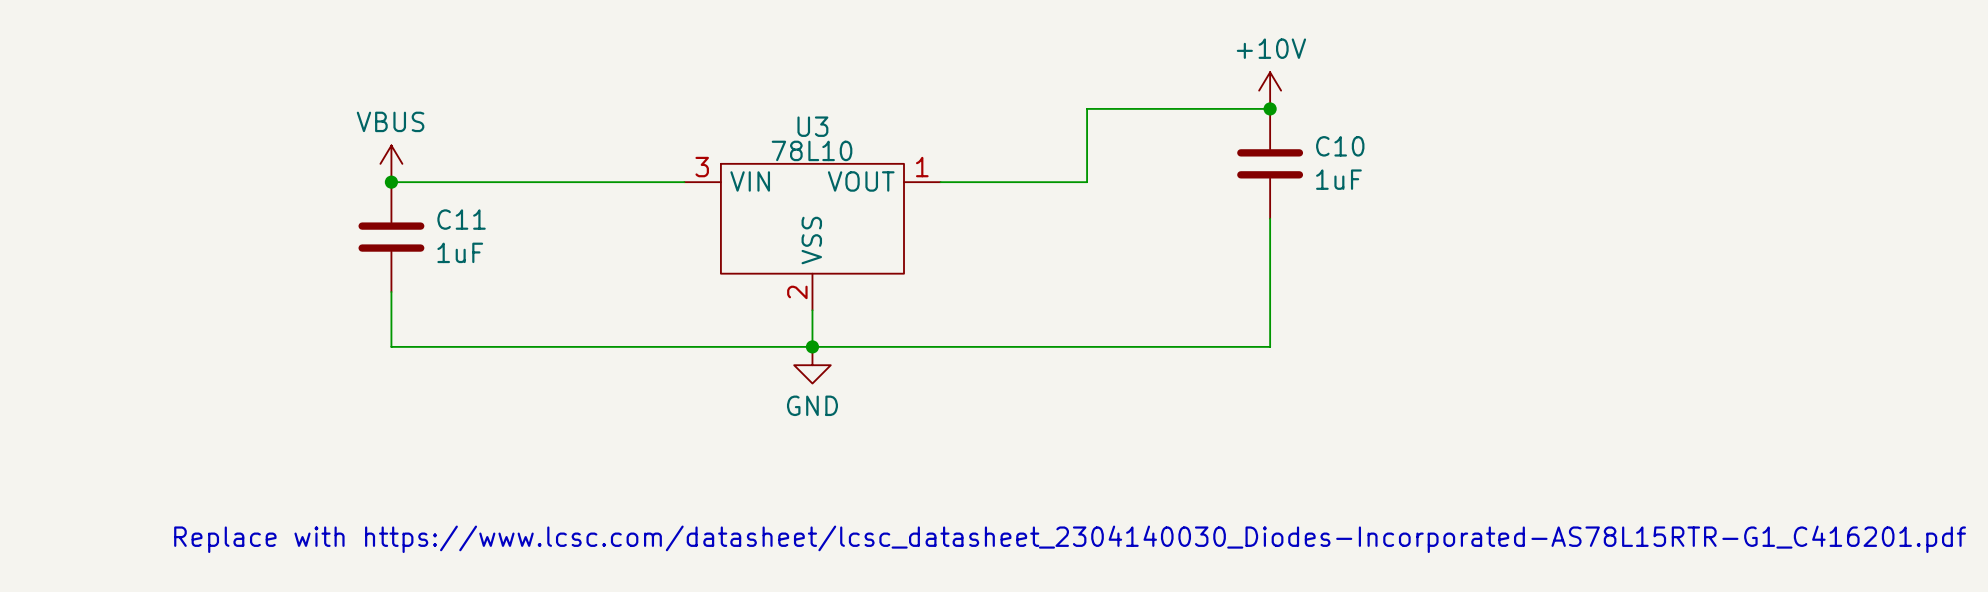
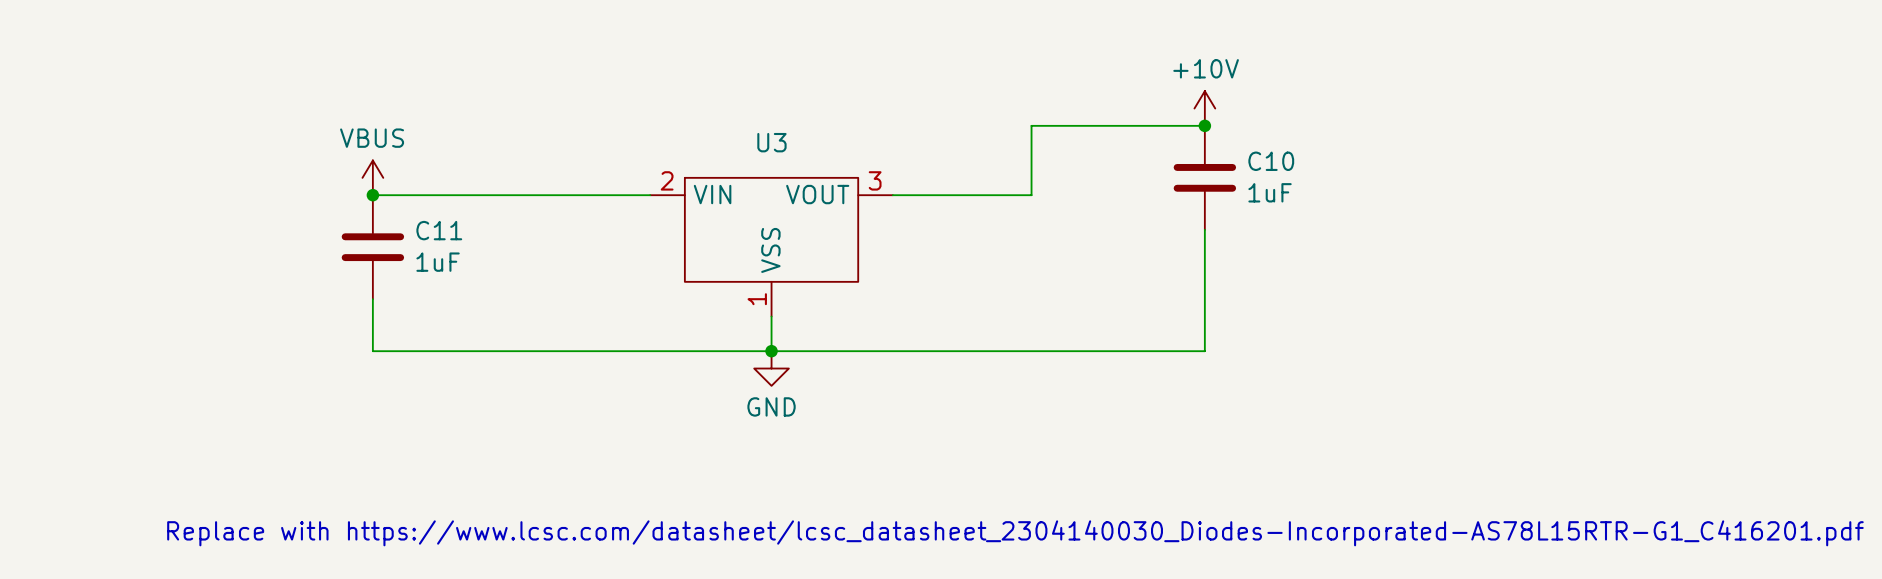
U3 value: 78L10 (812, 150) -> none
U3 pin number: 3 (702, 167) -> 2 (667, 180)
U3 pin number: 1 (922, 167) -> 3 (875, 180)
U3 pin number: 2 (797, 292) -> 1 (757, 299)

